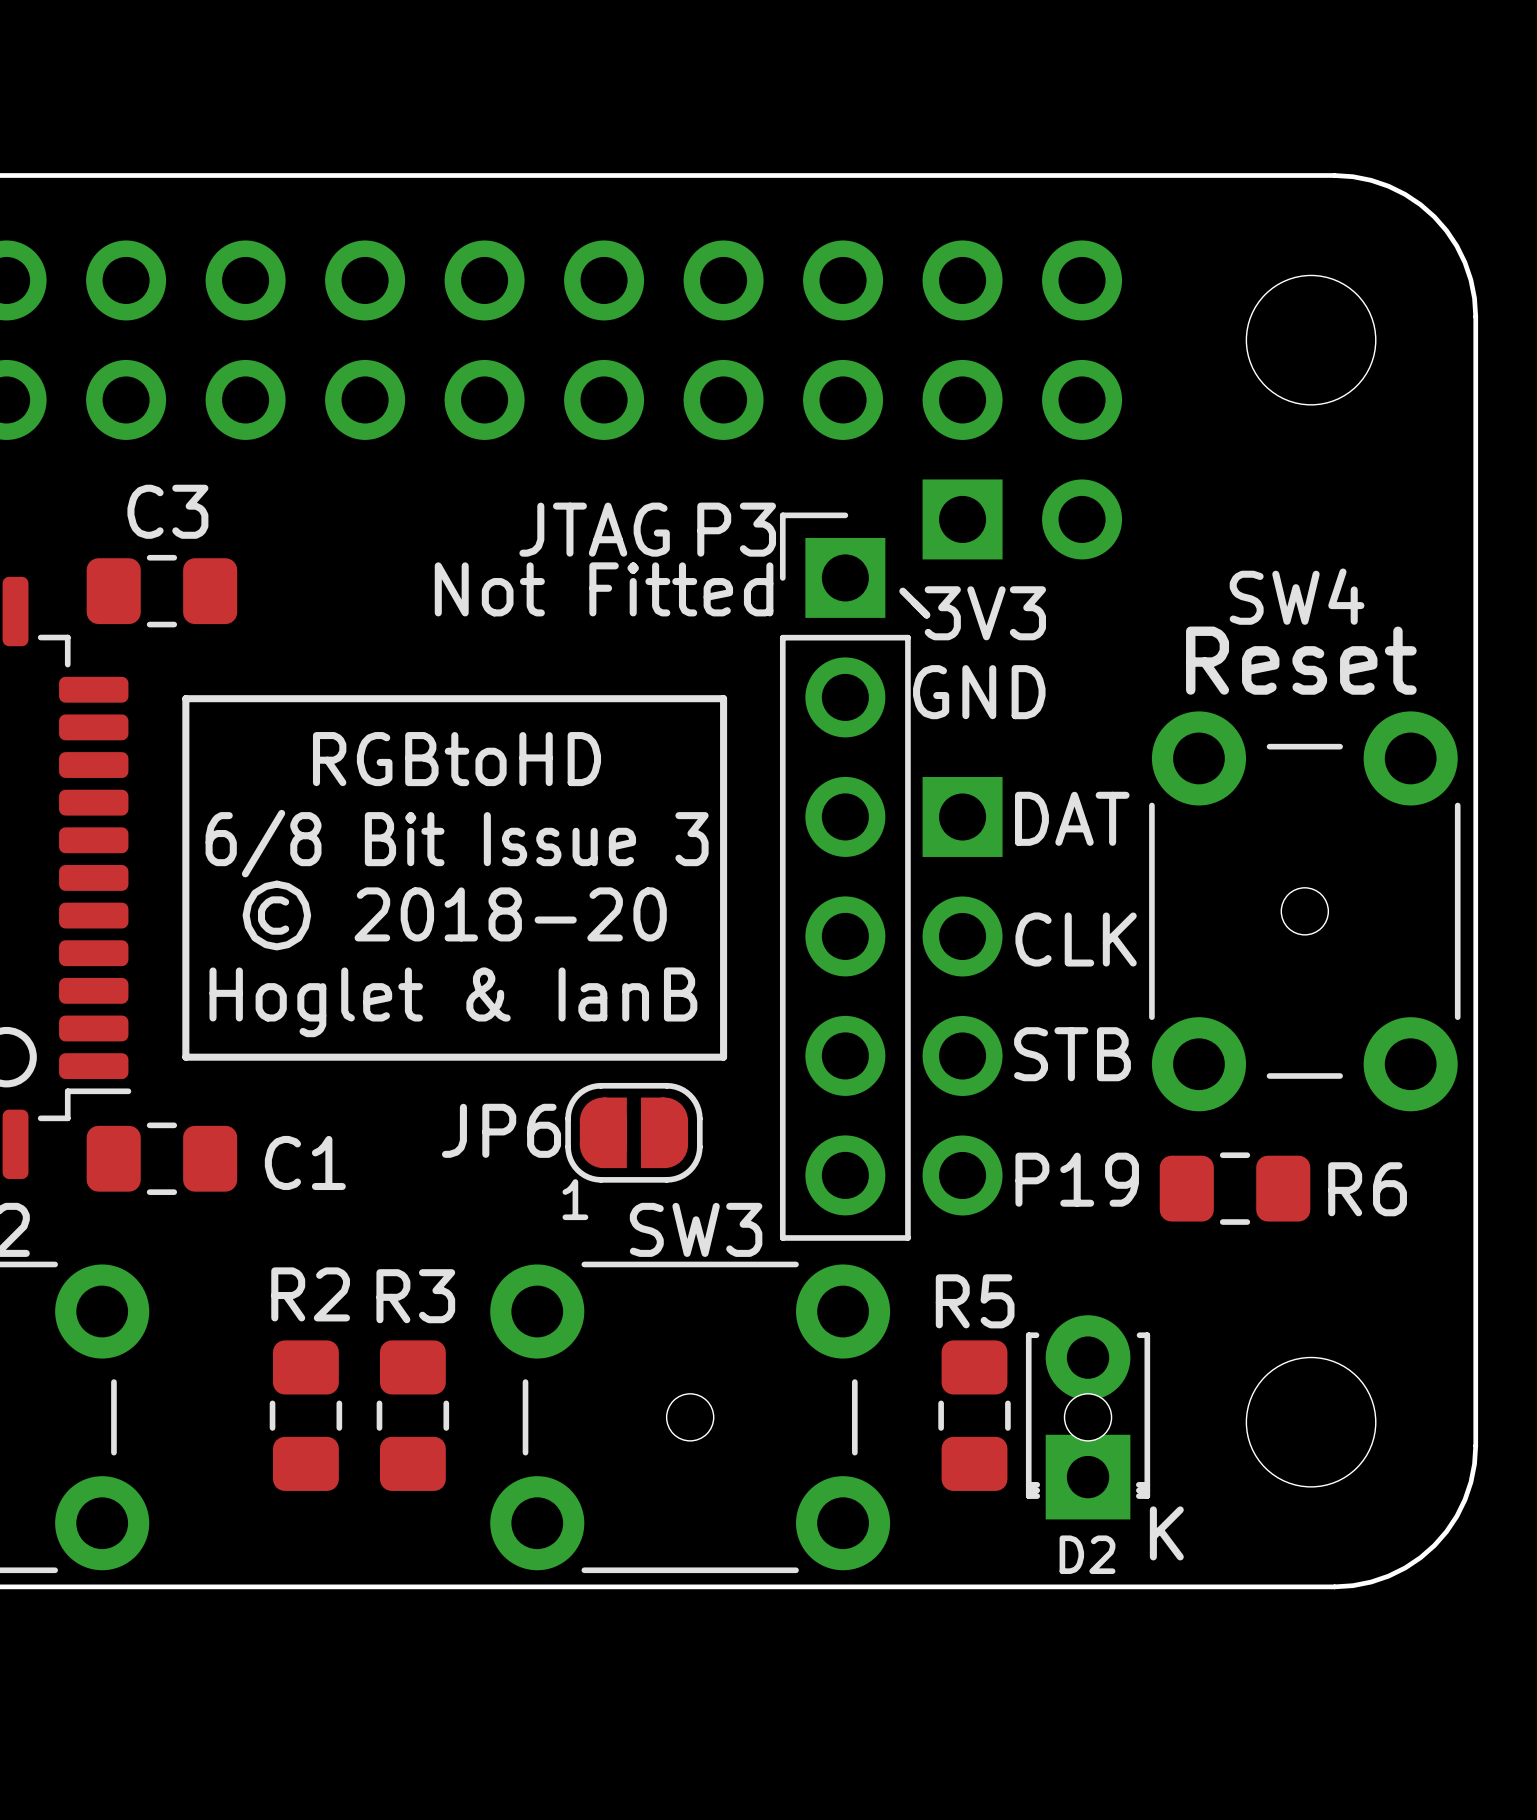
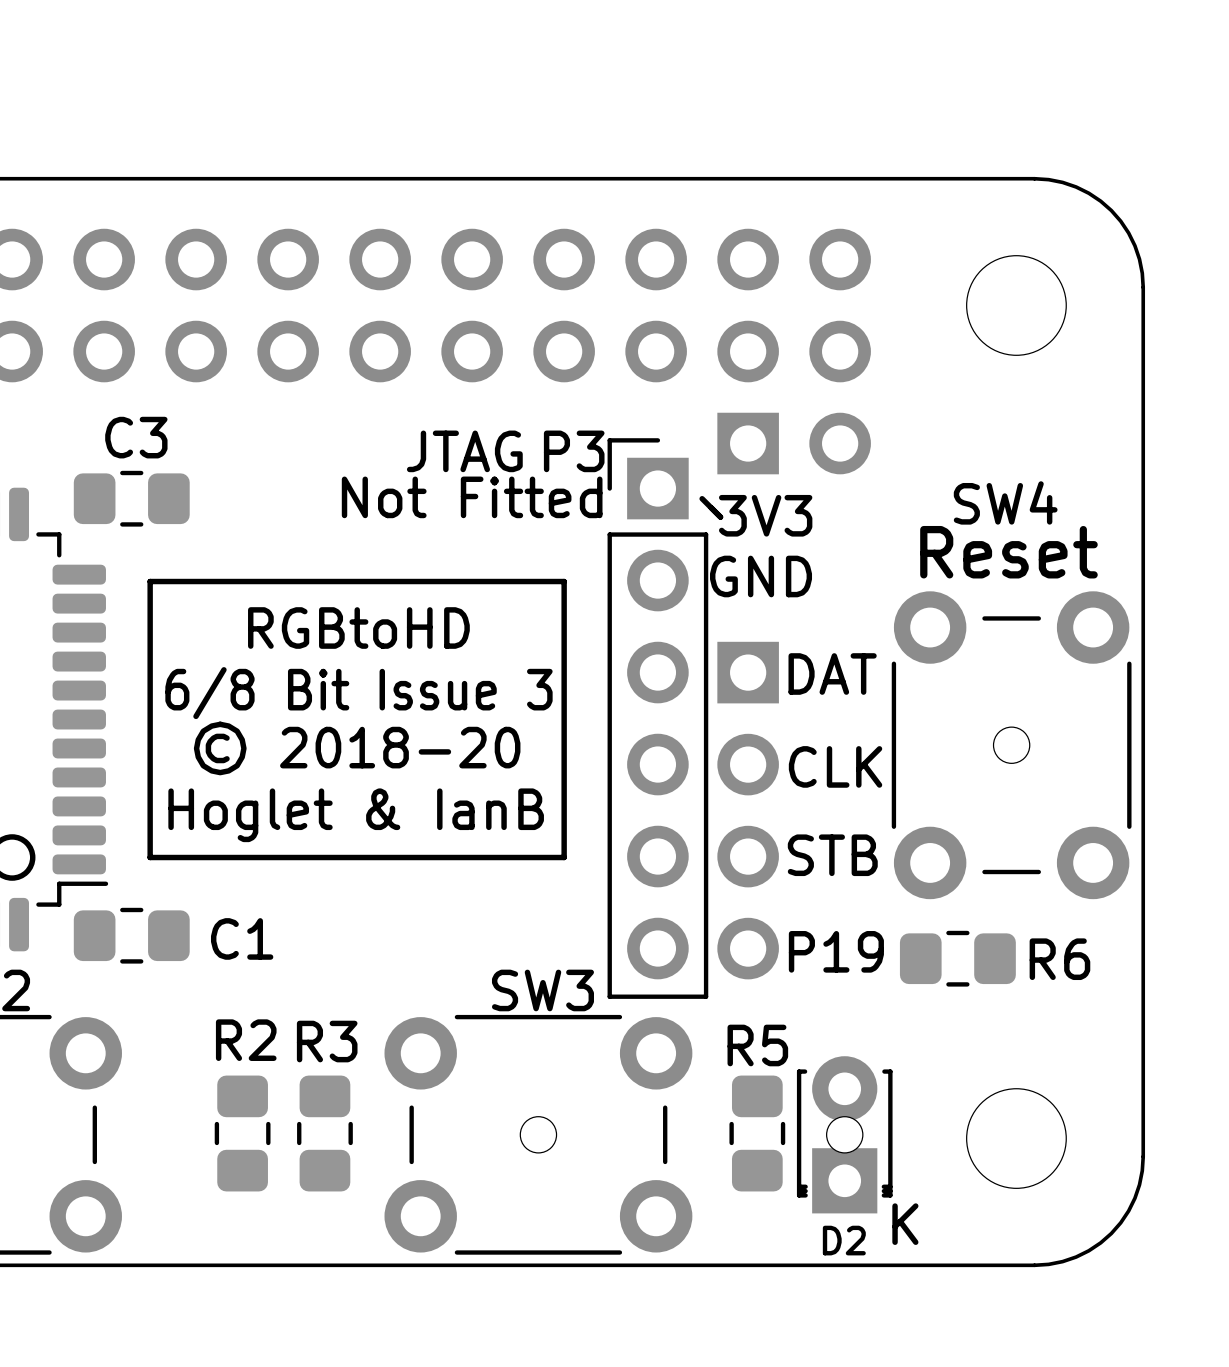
JP6: (633, 1132) -> none
text: 1 (575, 1199) -> none

